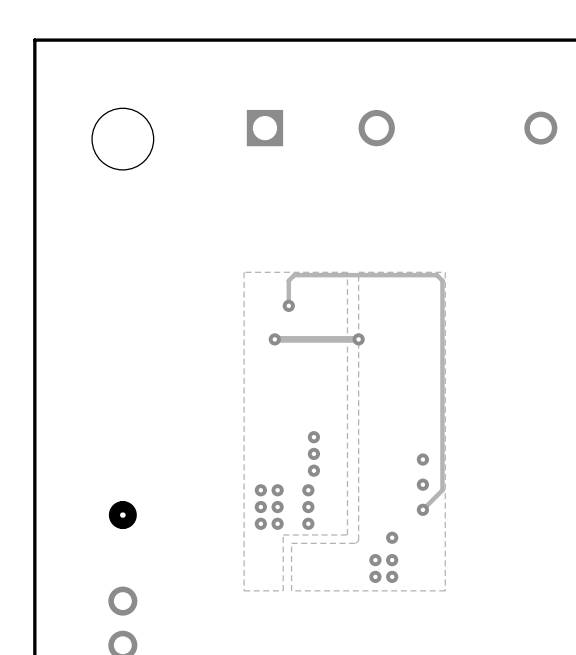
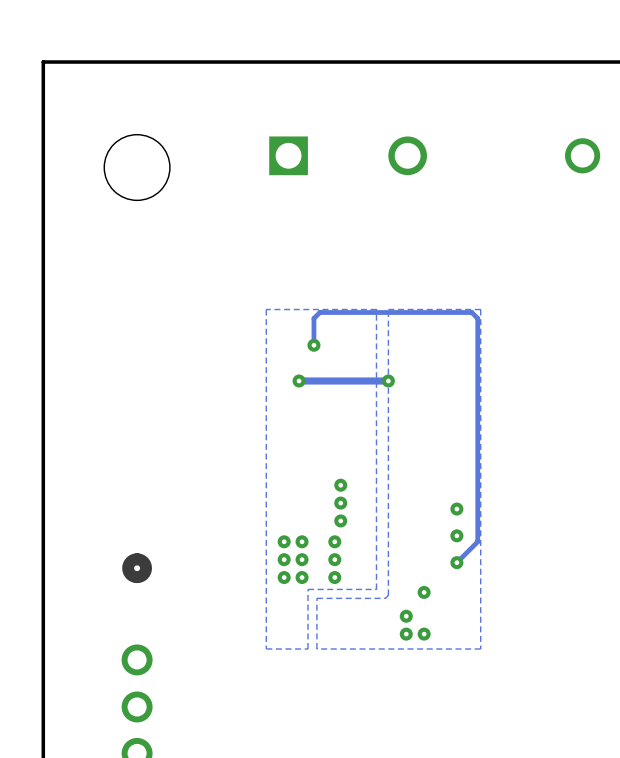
via: (392, 560) -> none

